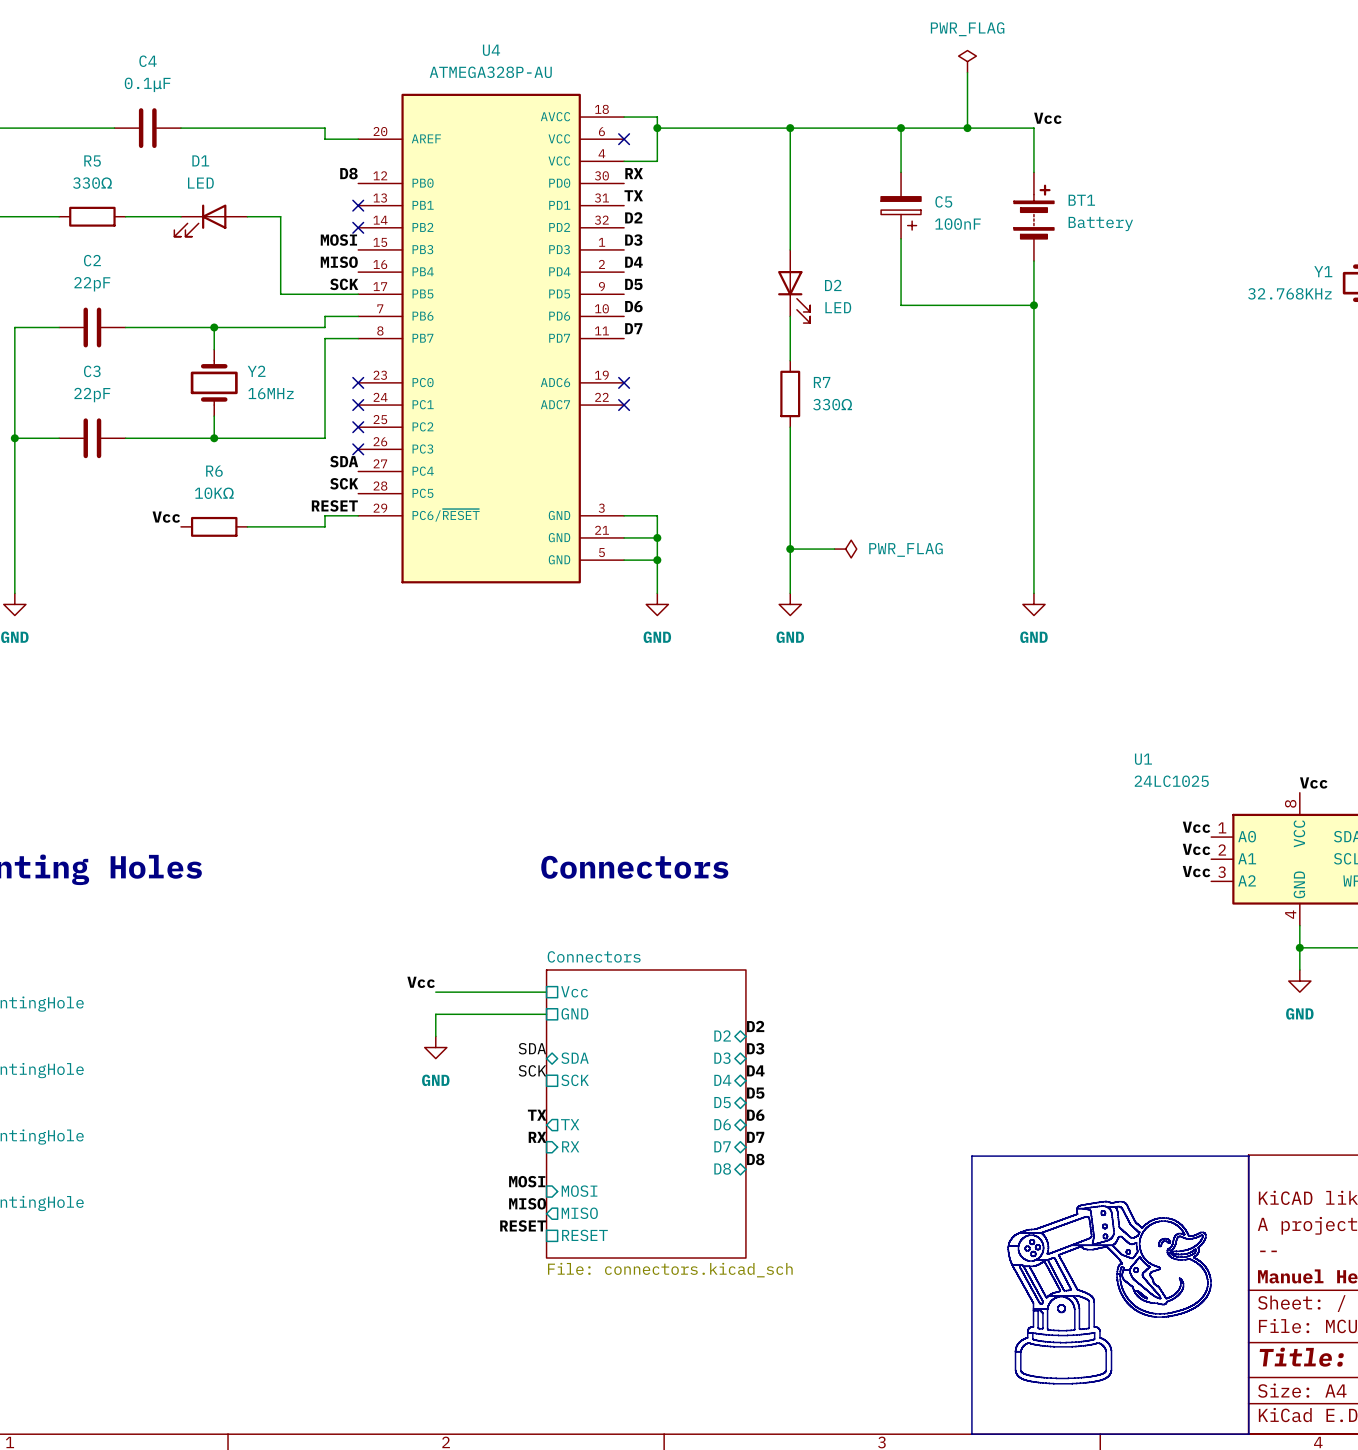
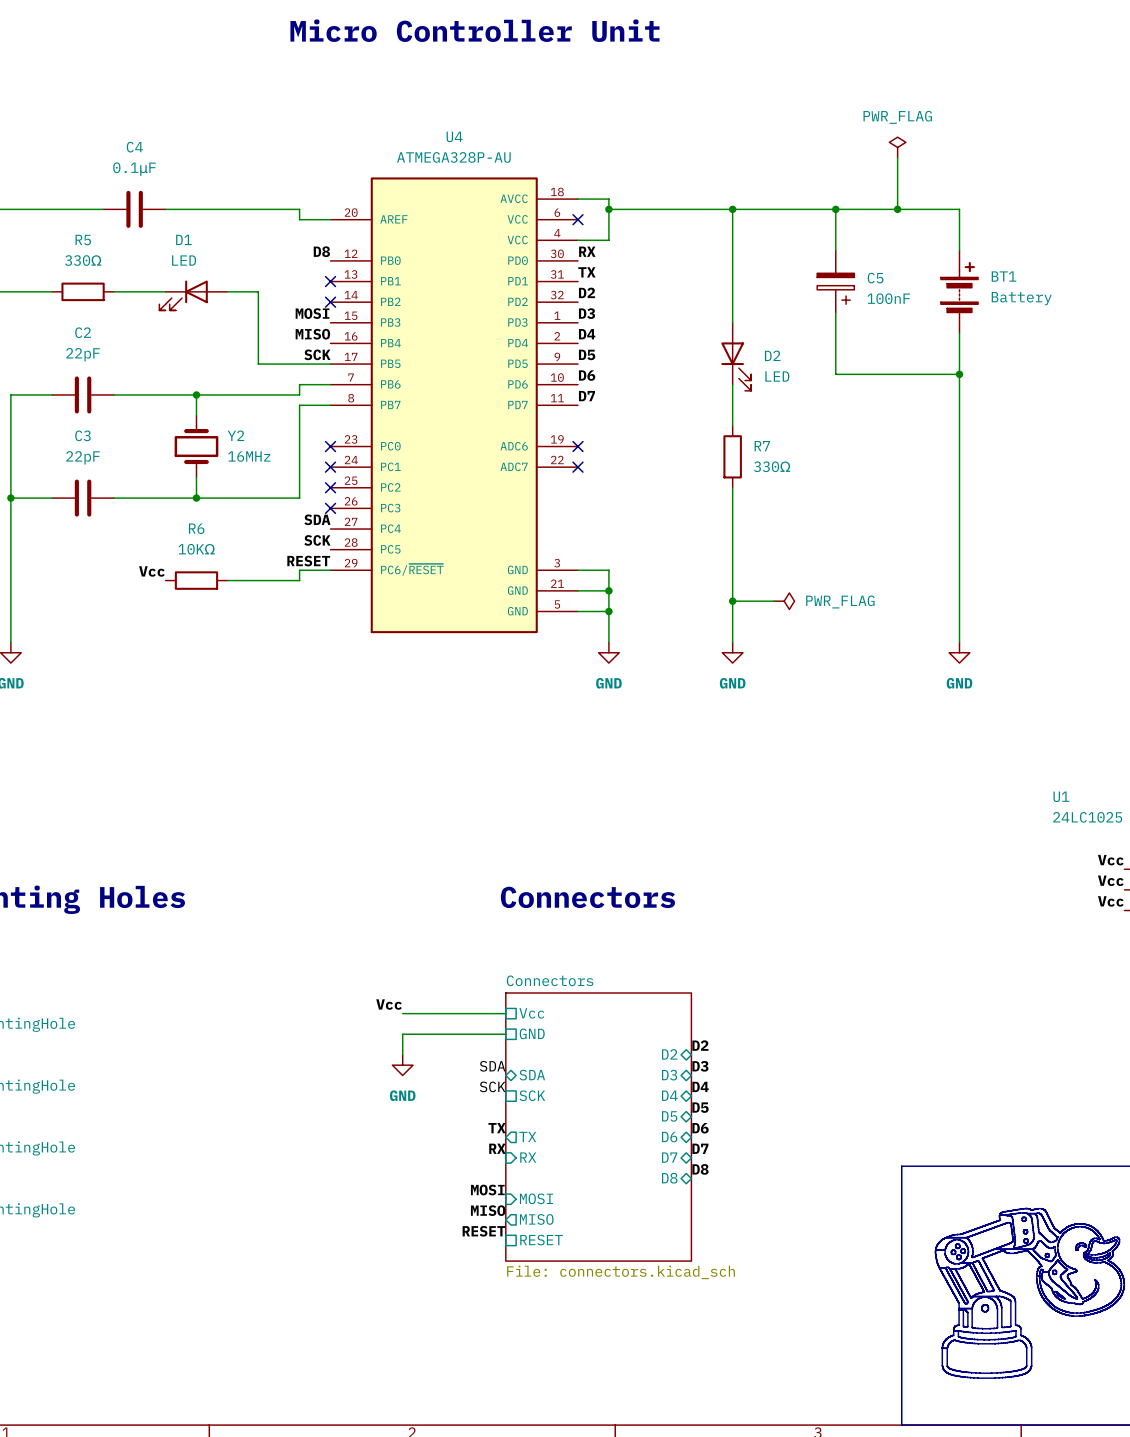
label: Vcc (1047, 118) -> none

